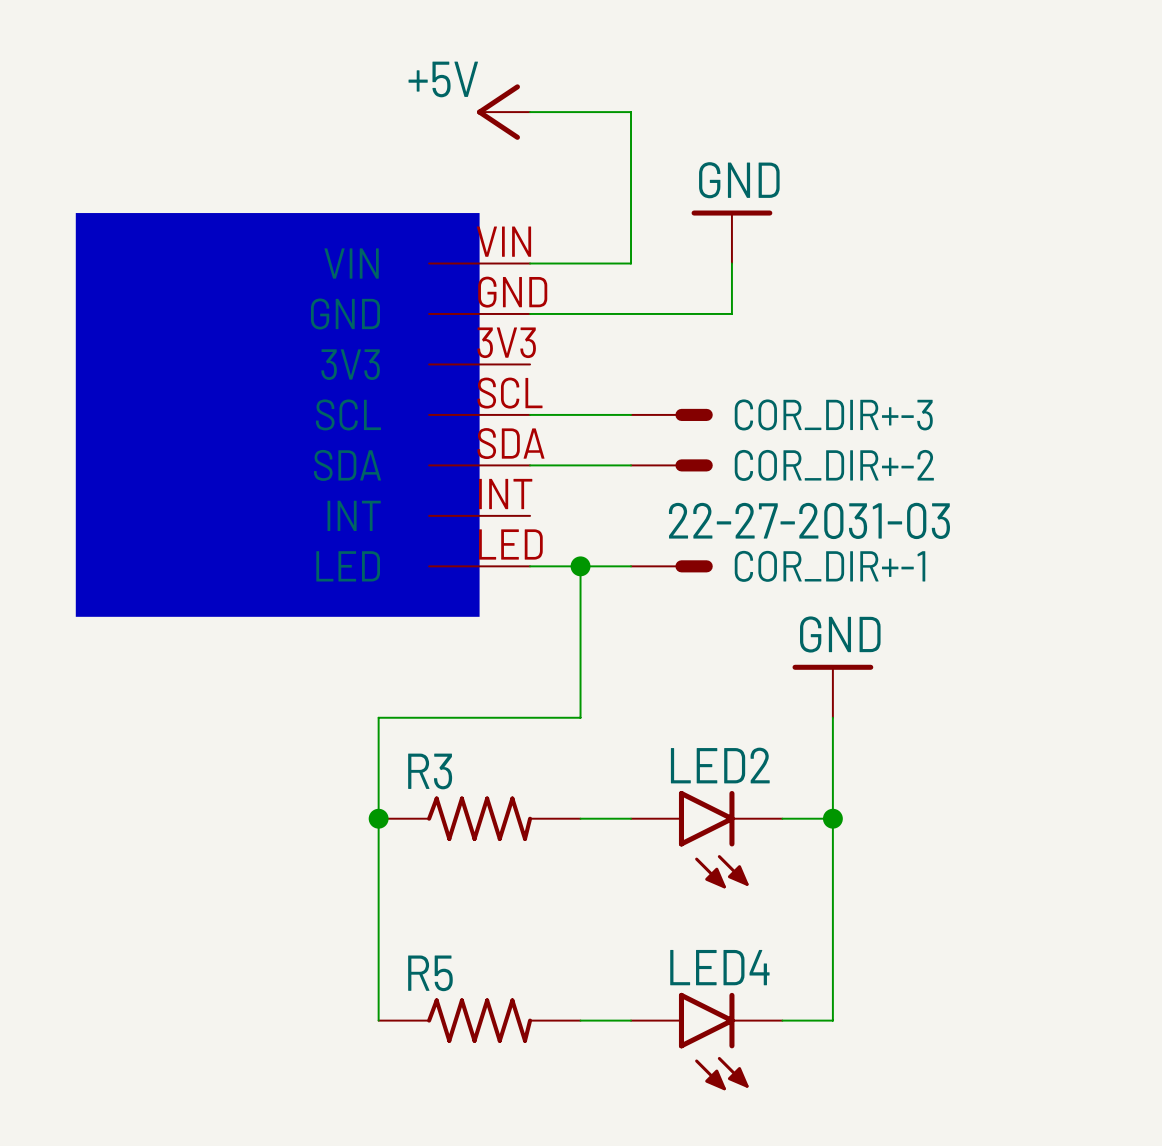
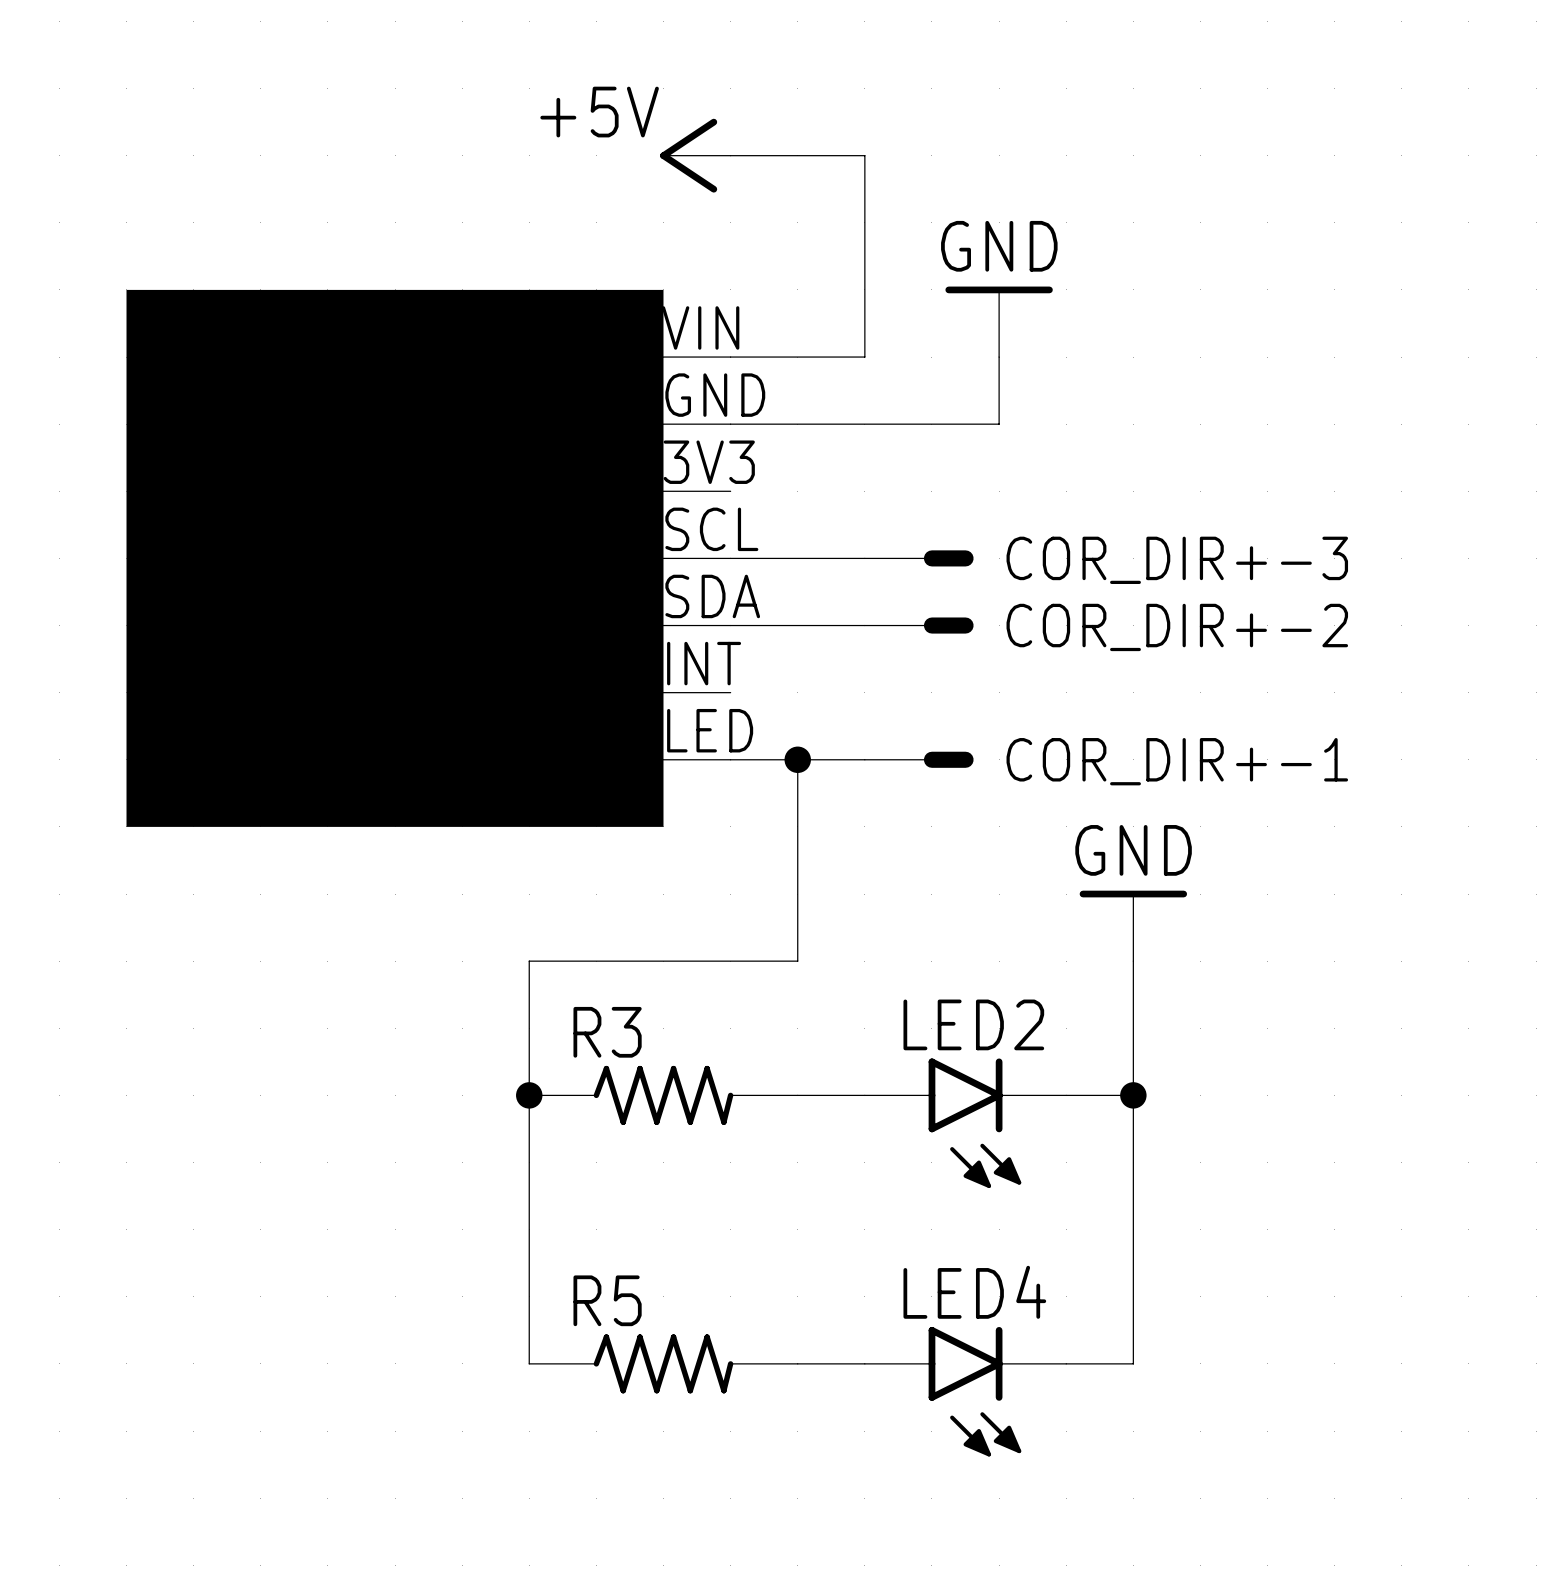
COR_DIR+-1 value: 22-27-2031-03 (809, 520) -> none

